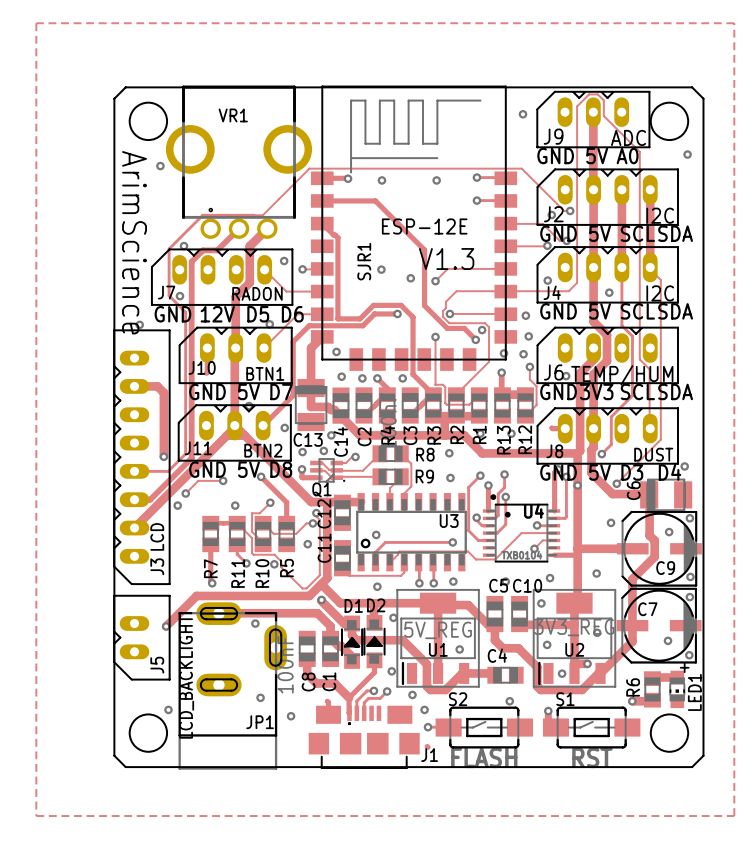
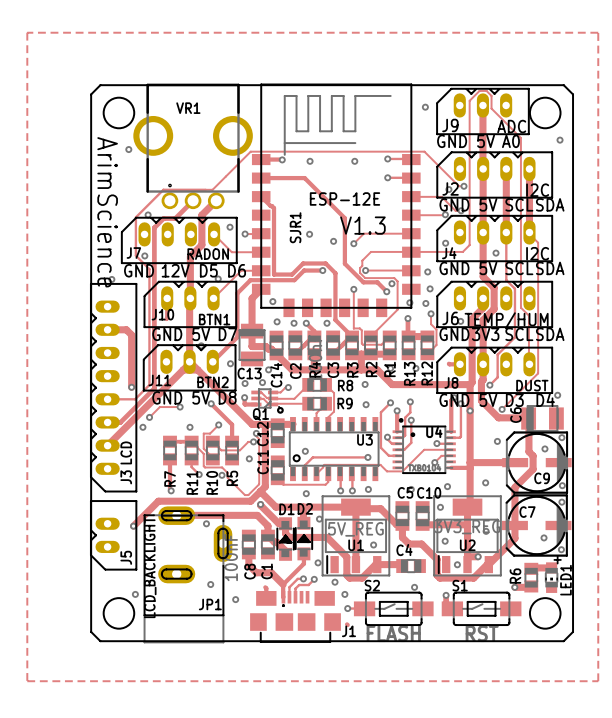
drawing: none -> [276, 406, 284, 414]

